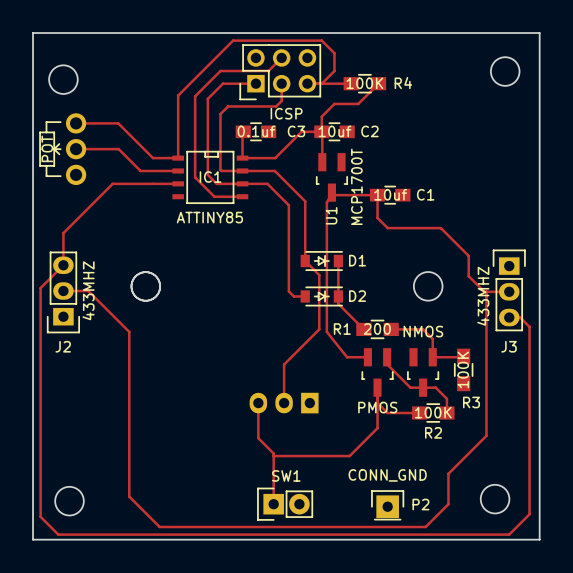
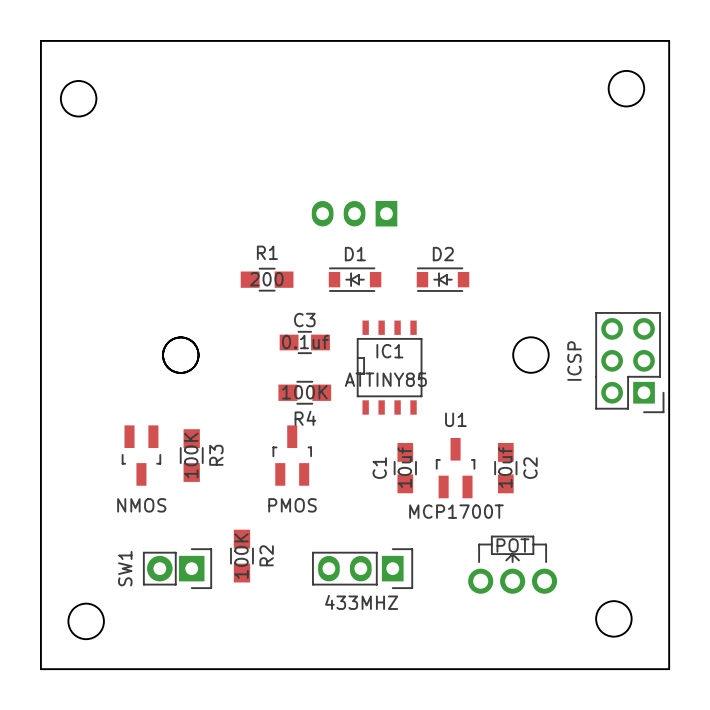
track: (281, 57) (268, 71) (220, 71) (195, 96) (195, 177) (214, 196) (242, 196) -> none
part: ICSP (280, 72) -> none
track: (255, 83) (223, 83) (207, 98) (207, 174) (216, 183) (267, 183) (288, 205) (288, 291) (293, 296) (305, 296) -> none
track: (281, 83) (281, 101) (276, 106) (228, 106) (220, 114) (220, 169) (274, 170) (305, 201) (305, 261) (319, 275) (319, 329) (284, 364) (284, 403) -> none
track: (307, 83) (351, 83) -> none
track: (321, 83) (334, 71) (334, 53) (321, 40) (233, 40) (178, 95) (178, 158) (153, 158) (118, 123) (76, 123) -> none
R4 position: (364, 83) -> (304, 392)
track: (378, 83) (358, 103) (334, 103) (321, 116) (321, 131) -> none
R4 name position: R4 (403, 83) -> R4 (305, 418)
track: (243, 131) (242, 158) (275, 158) (301, 131) (321, 131) -> none
C3 position: (255, 131) -> (304, 342)
C3 name position: C3 (296, 131) -> C3 (304, 320)
track: (321, 131) (322, 162) -> none
C2 rotation: 0° (334, 131) -> 90° clockwise (505, 468)
C2 position: (334, 131) -> (505, 468)
part: POT (62, 149) -> none
track: (76, 149) (118, 149) (140, 170) (178, 170) -> none
IC1 rotation: 0° (210, 177) -> 90° counterclockwise (389, 367)
IC1 position: (210, 177) -> (389, 367)
U1 rotation: 0° (331, 177) -> 180° (455, 468)
U1 position: (331, 177) -> (455, 468)
track: (178, 183) (112, 183) (63, 233) (63, 265) (40, 288) (40, 516) (58, 534) (509, 534) (529, 514) (529, 326) (520, 317) (509, 317) -> none
U1 value position: MCP1700T (356, 186) -> MCP1700T (456, 511)
C1 name position: C1 (425, 194) -> C1 (379, 468)
C1 rotation: 0° (390, 195) -> 90° clockwise (405, 468)
C1 position: (390, 195) -> (405, 468)
IC1 value position: ATTINY85 (209, 217) -> ATTINY85 (385, 379)
D1 name position: D1 (357, 260) -> D1 (355, 254)
D1 rotation: 0° (321, 261) -> 180° (355, 279)
D1 position: (321, 261) -> (355, 279)
track: (338, 261) (338, 303) (363, 329) -> none
J3: 433MHZ (509, 290) -> none
track: (63, 291) (88, 291) (129, 331) (129, 496) (159, 527) (425, 527) (448, 504) (448, 473) (486, 435) (486, 291) -> none
track: (509, 291) (484, 291) (468, 276) (468, 255) (440, 228) (387, 228) (377, 217) (377, 195) (334, 195) (331, 192) (326, 202) (326, 331) (347, 357) (367, 357) -> none
J2: 433MHZ (63, 292) -> none
part: none -> ICSP (629, 362)
D2 rotation: 0° (321, 296) -> 180° (443, 279)
D2 position: (321, 296) -> (443, 279)
D2 name position: D2 (357, 296) -> D2 (443, 254)
R1 name position: R1 (342, 329) -> R1 (267, 252)
R1 position: (377, 329) -> (267, 279)
track: (391, 329) (423, 329) (432, 339) (432, 357) (463, 356) -> none
track: (387, 357) (387, 364) (410, 387) (435, 387) (446, 398) (446, 413) -> none
part: none -> NMOS (141, 455)
R3 position: (463, 369) -> (191, 455)
part rotation: 0° (377, 372) -> 180° (292, 455)
part position: (377, 372) -> (292, 455)
part: NMOS (423, 372) -> none
track: (377, 387) (377, 428) (349, 456) (273, 456) -> none
track: (377, 402) (387, 413) (419, 413) -> none
R3 name rotation: 0° (471, 402) -> 90° counterclockwise (216, 455)
R3 name position: R3 (471, 402) -> R3 (216, 455)
track: (258, 403) (258, 438) (273, 453) (273, 504) -> none
part position: (284, 403) -> (354, 213)
R2 rotation: 0° (433, 413) -> 90° clockwise (241, 556)
R2 position: (433, 413) -> (241, 556)
R2 name position: R2 (433, 432) -> R2 (266, 555)
part: none -> POT (512, 564)
part: none -> 433MHZ (362, 568)
SW1 name position: SW1 (286, 475) -> SW1 (125, 568)
SW1 rotation: 0° (285, 504) -> 180° (177, 568)
SW1 position: (285, 504) -> (177, 568)
P2: CONN_GND (387, 505) -> none

